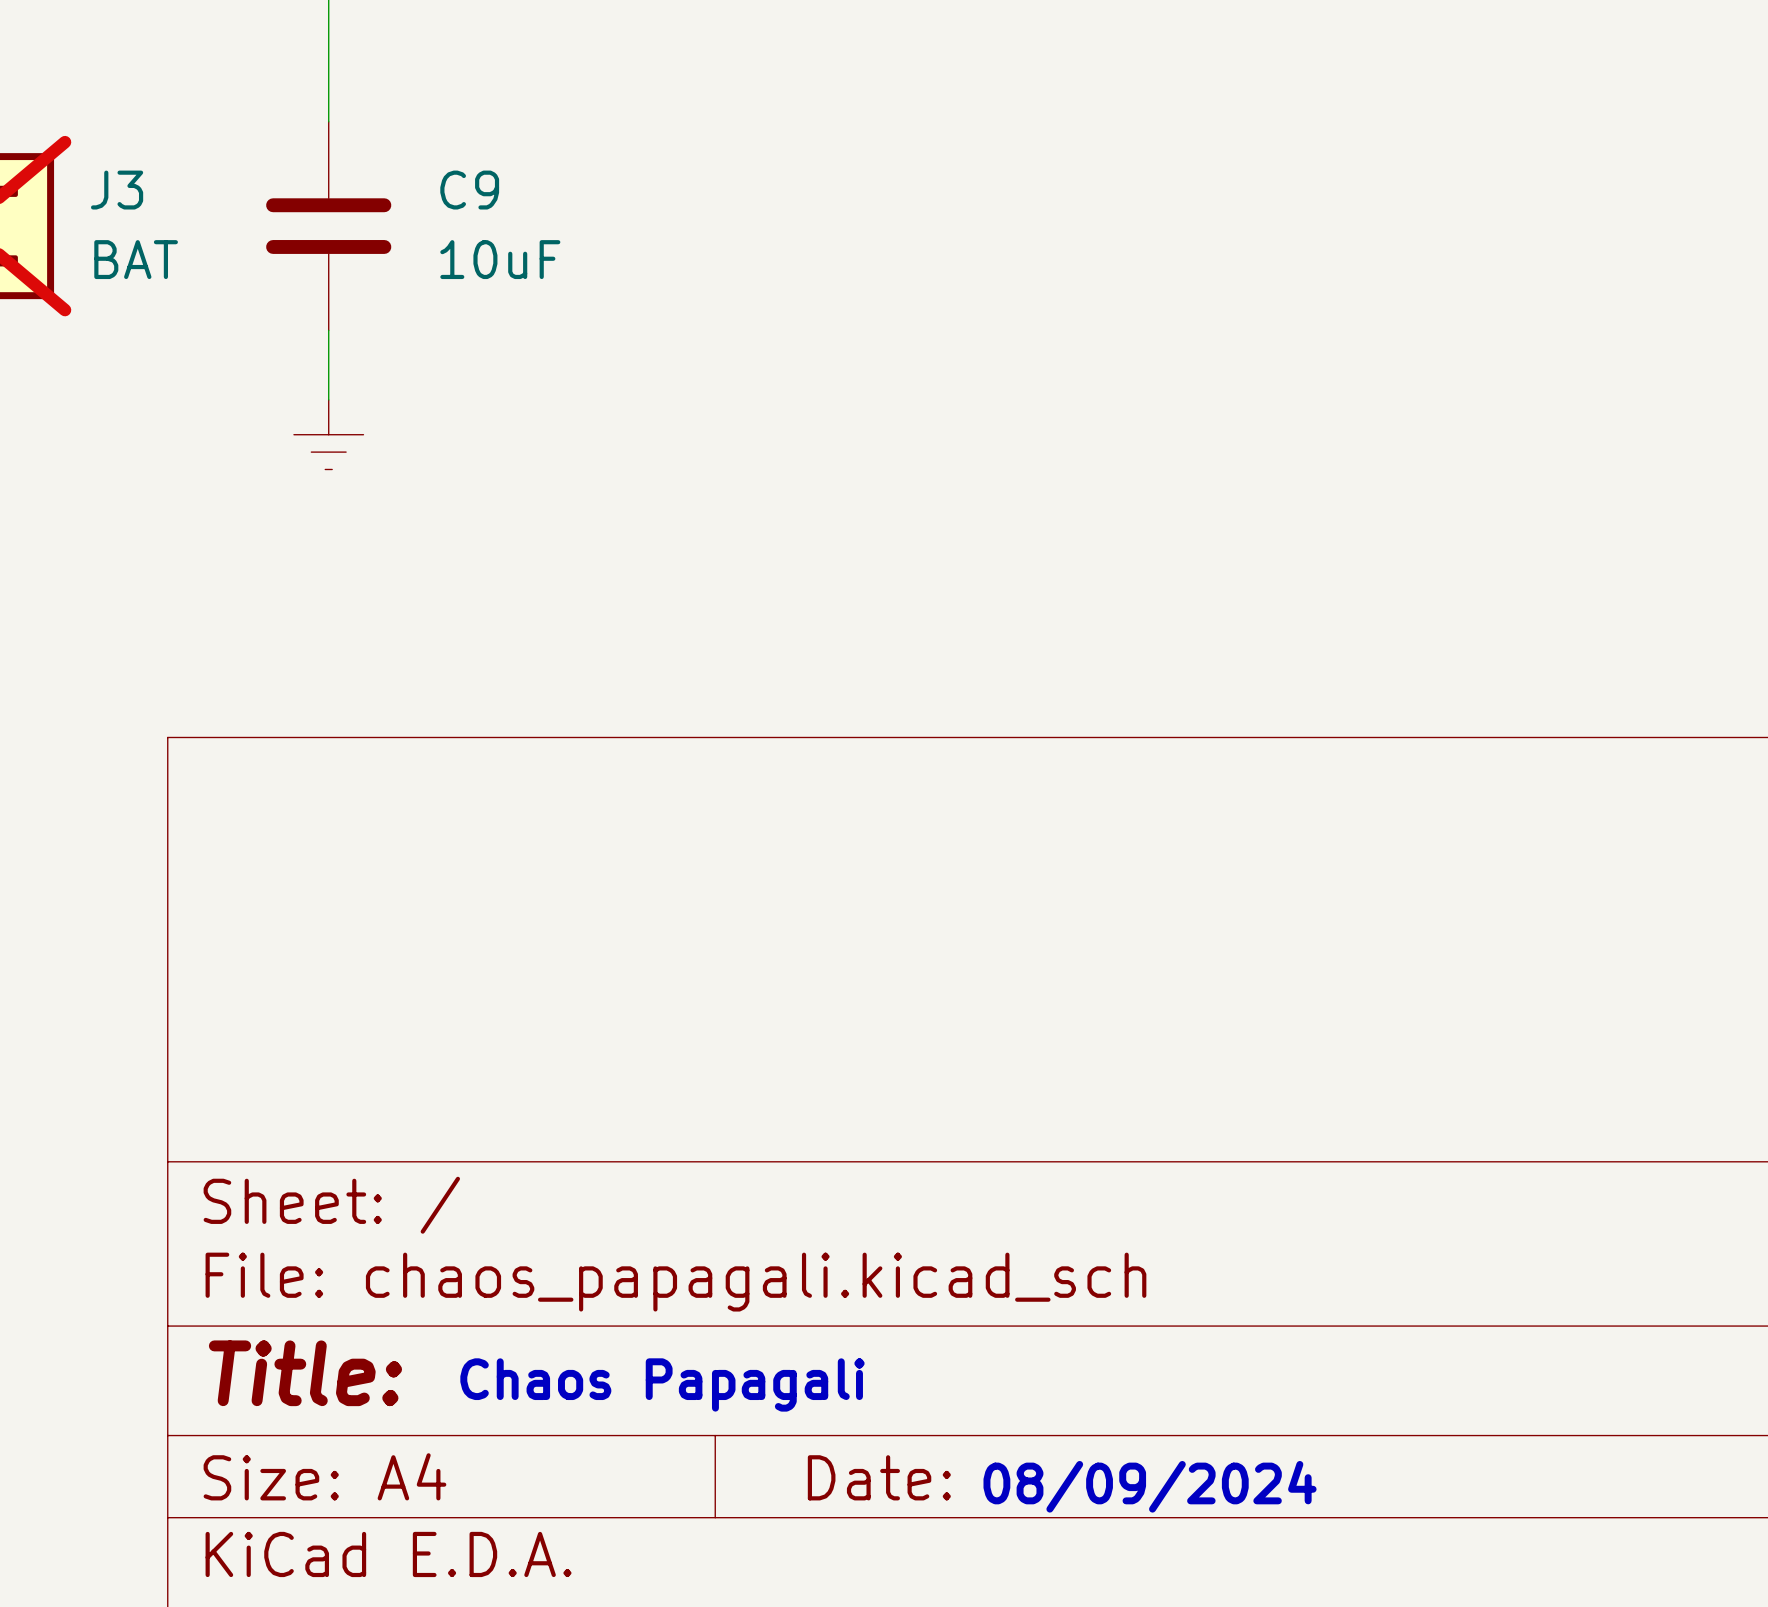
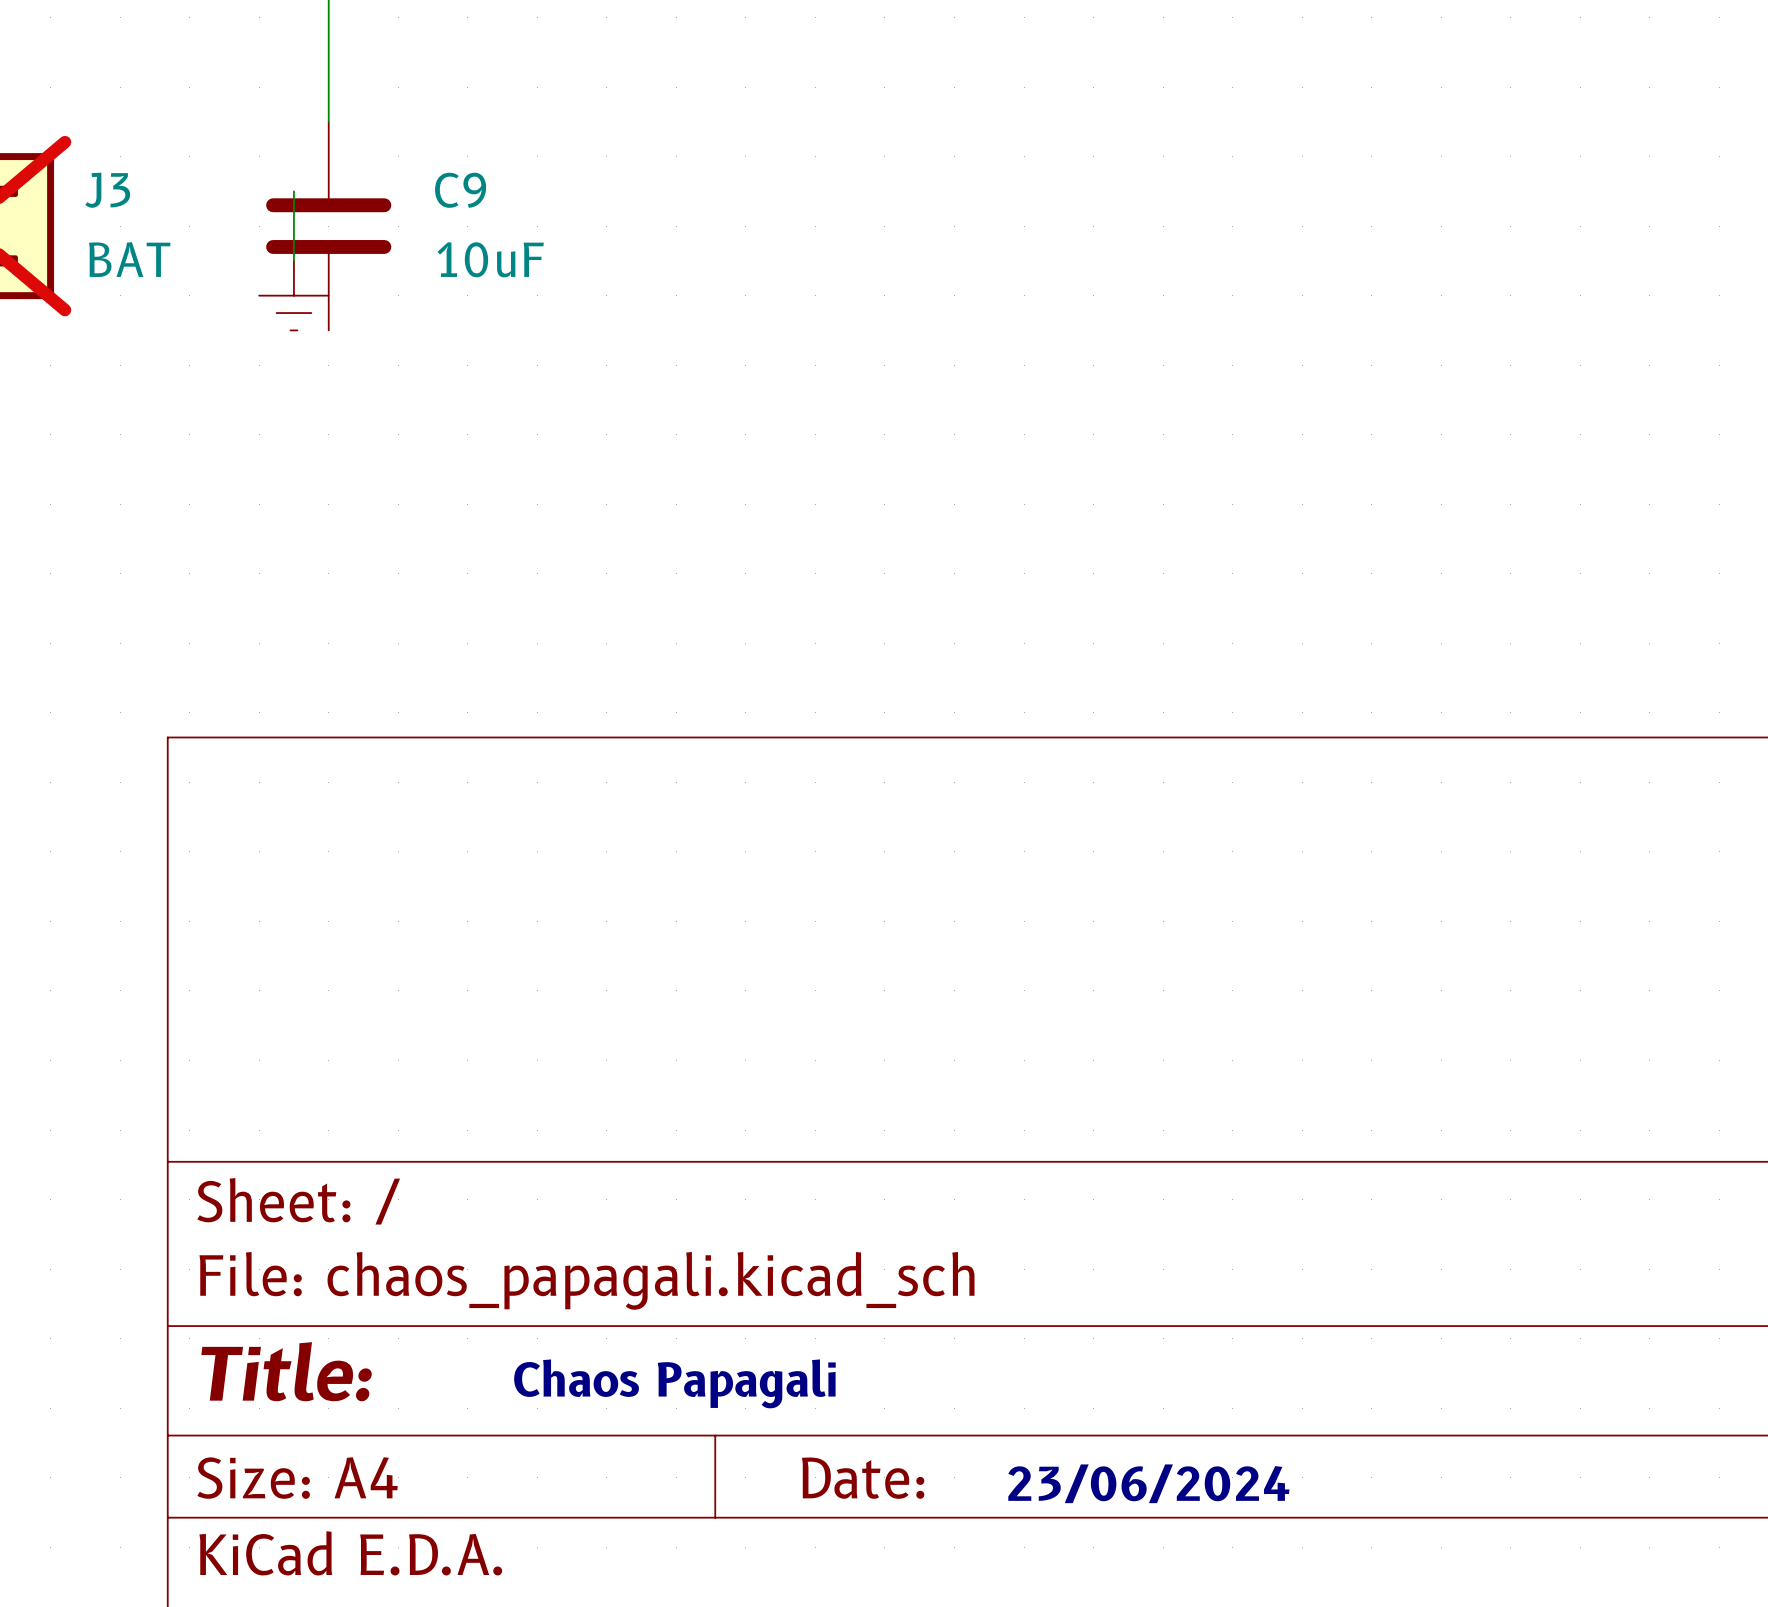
wire: (328, 330) (328, 399) -> (293, 191) (293, 260)
power symbol position: (328, 434) -> (293, 295)
text position: Chaos Papagali (662, 1384) -> Chaos Papagali (674, 1383)
text: 08/09/2024 (1150, 1486) -> 23/06/2024 (1148, 1483)

